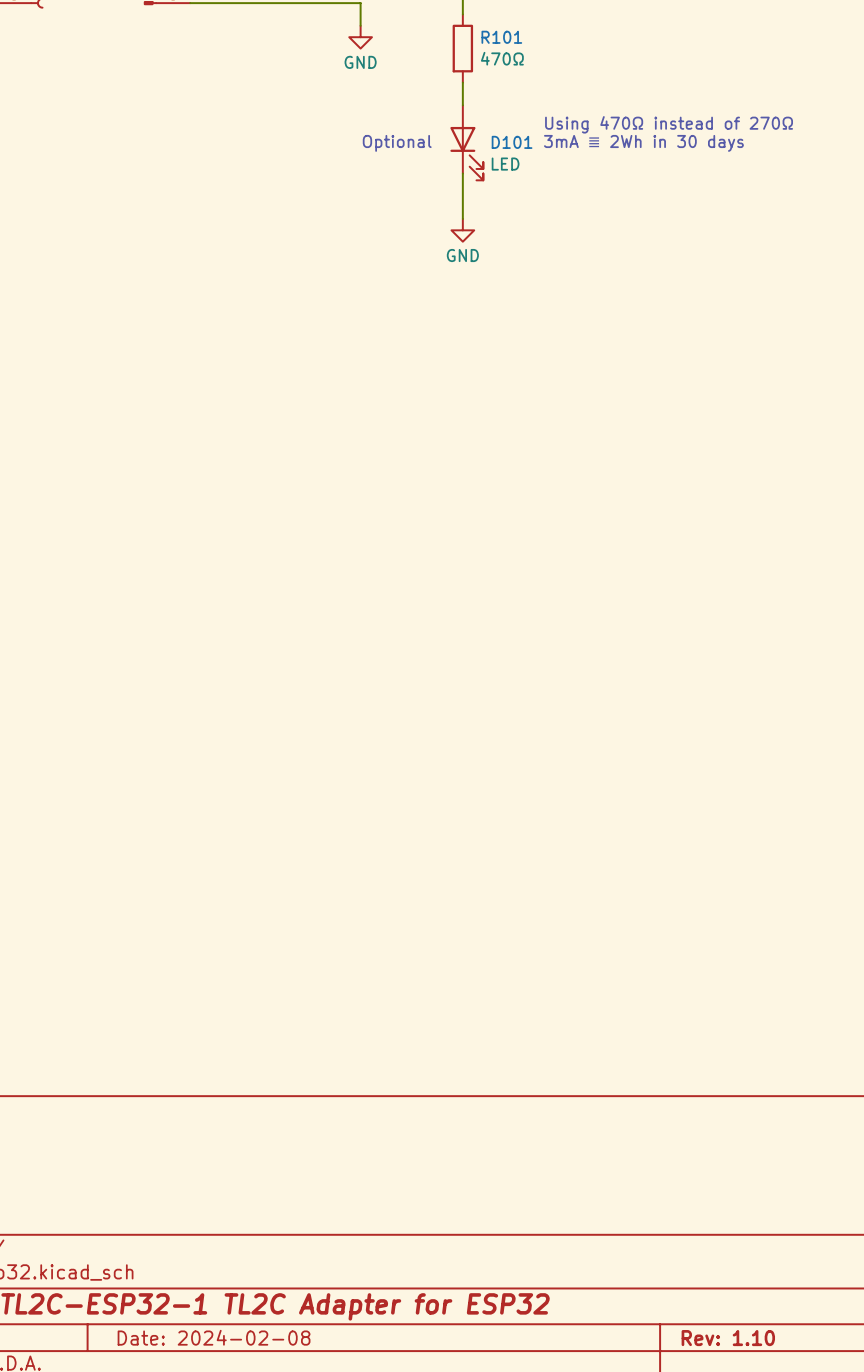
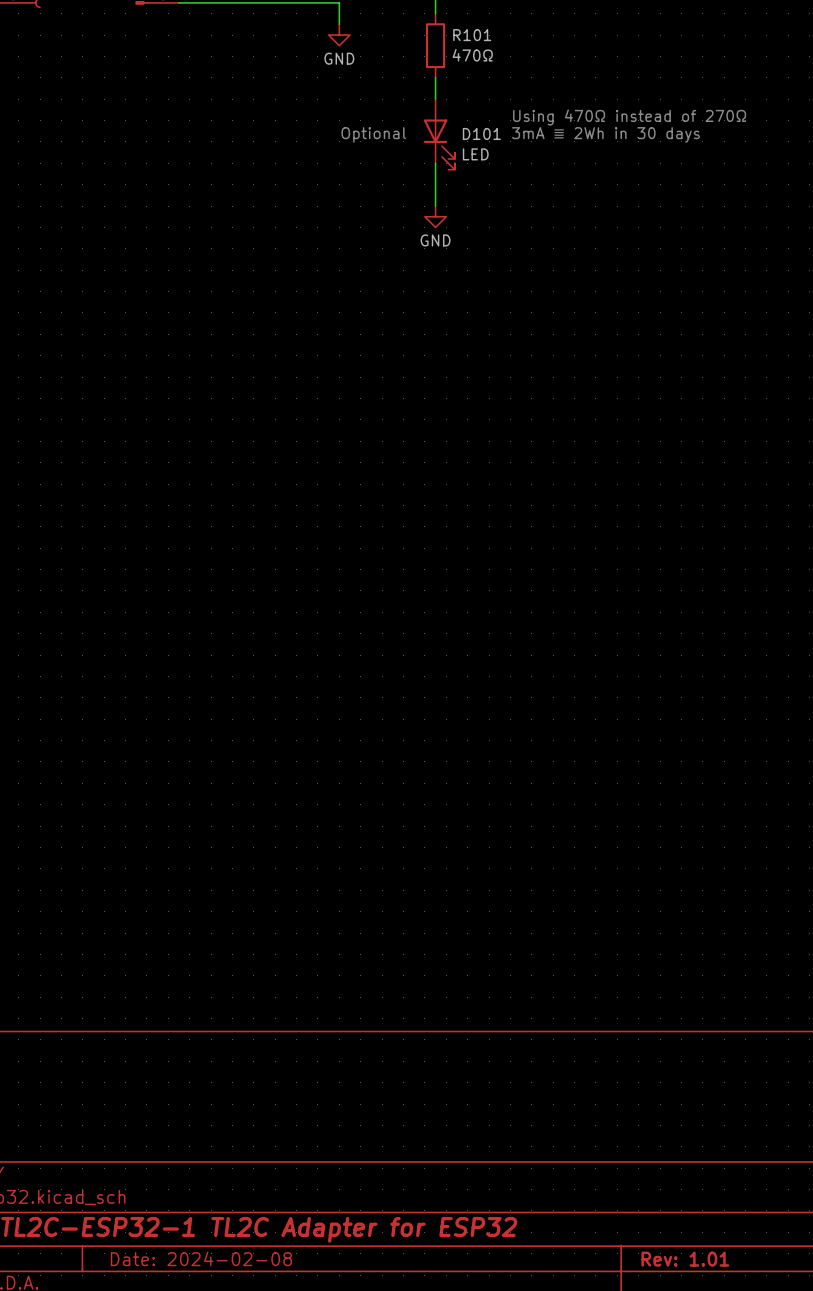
title block: Rev: 1.10 (728, 1338) -> Rev: 1.01 (685, 1259)

